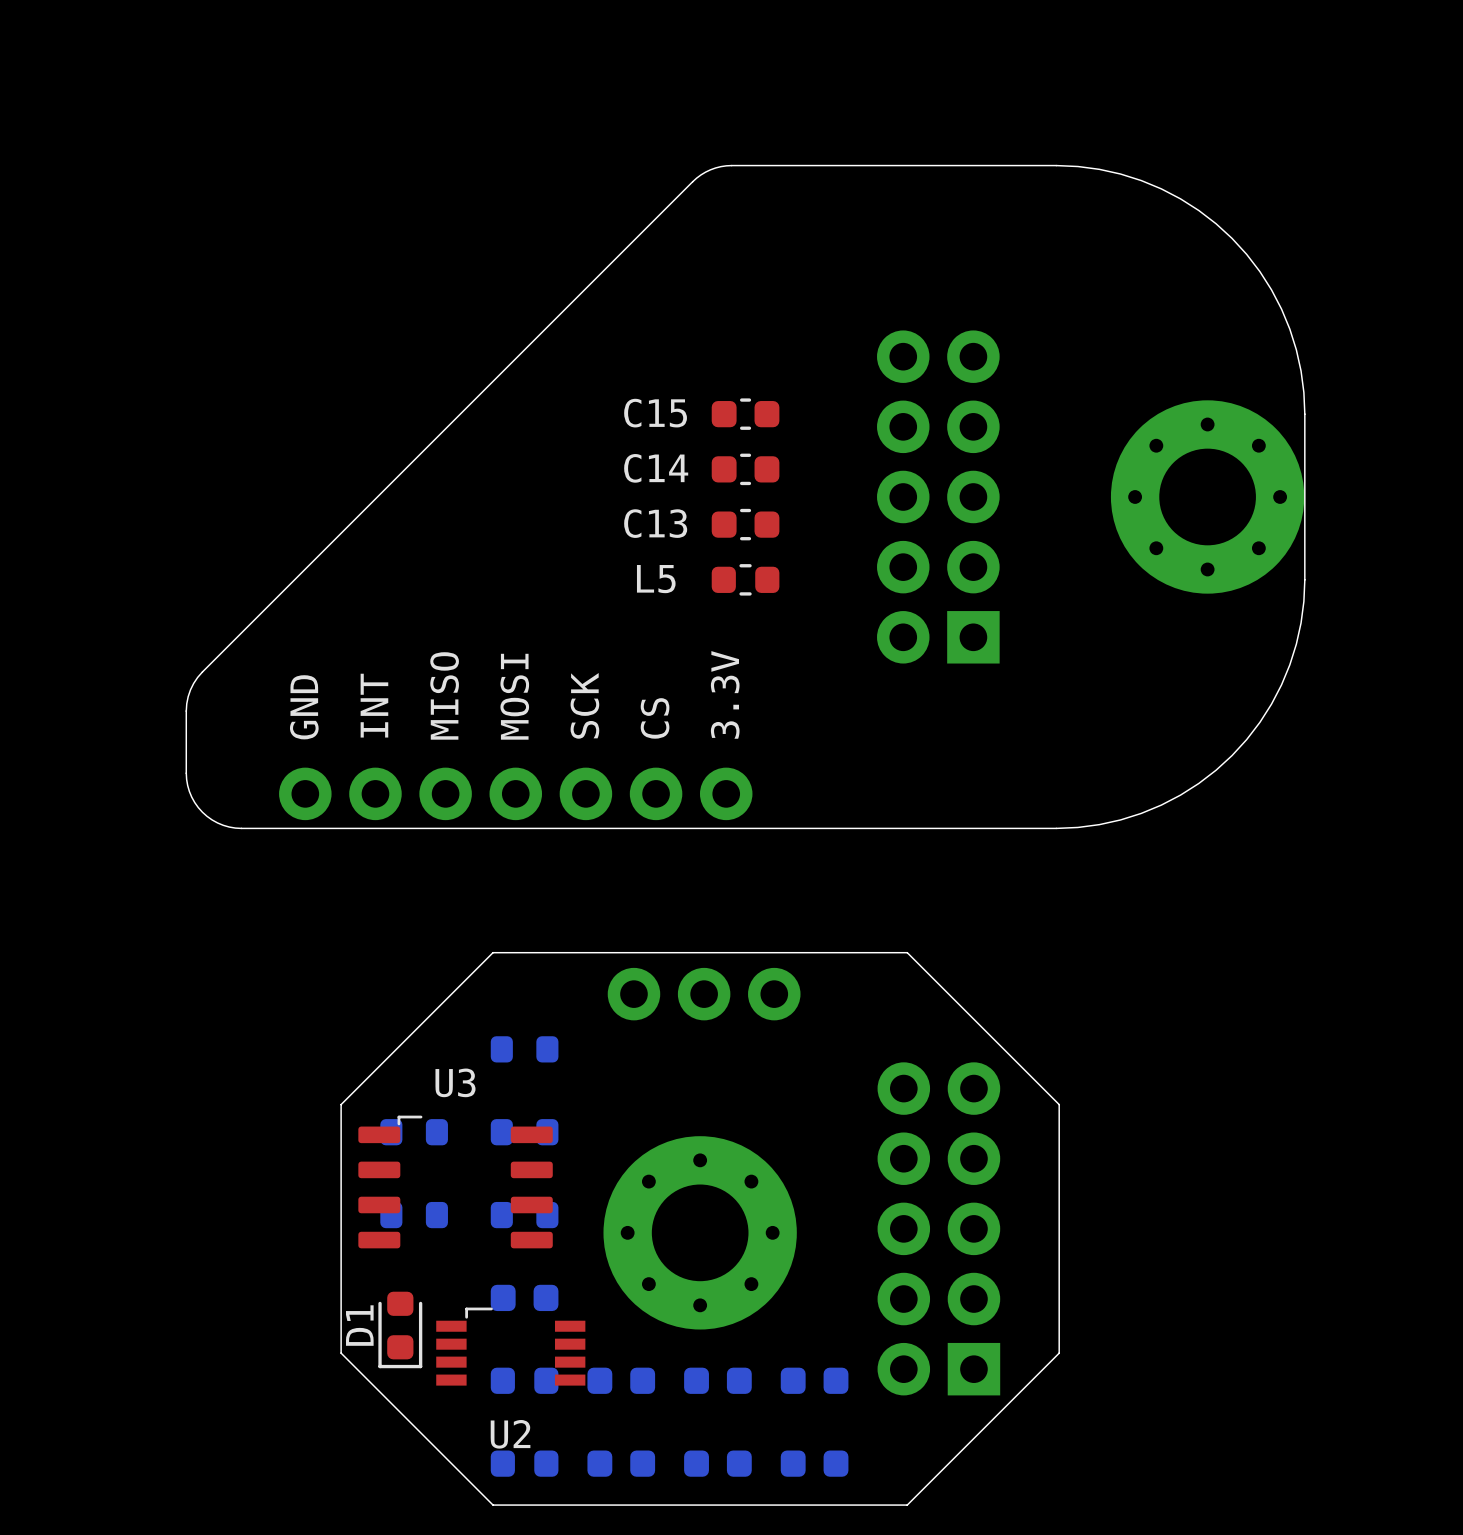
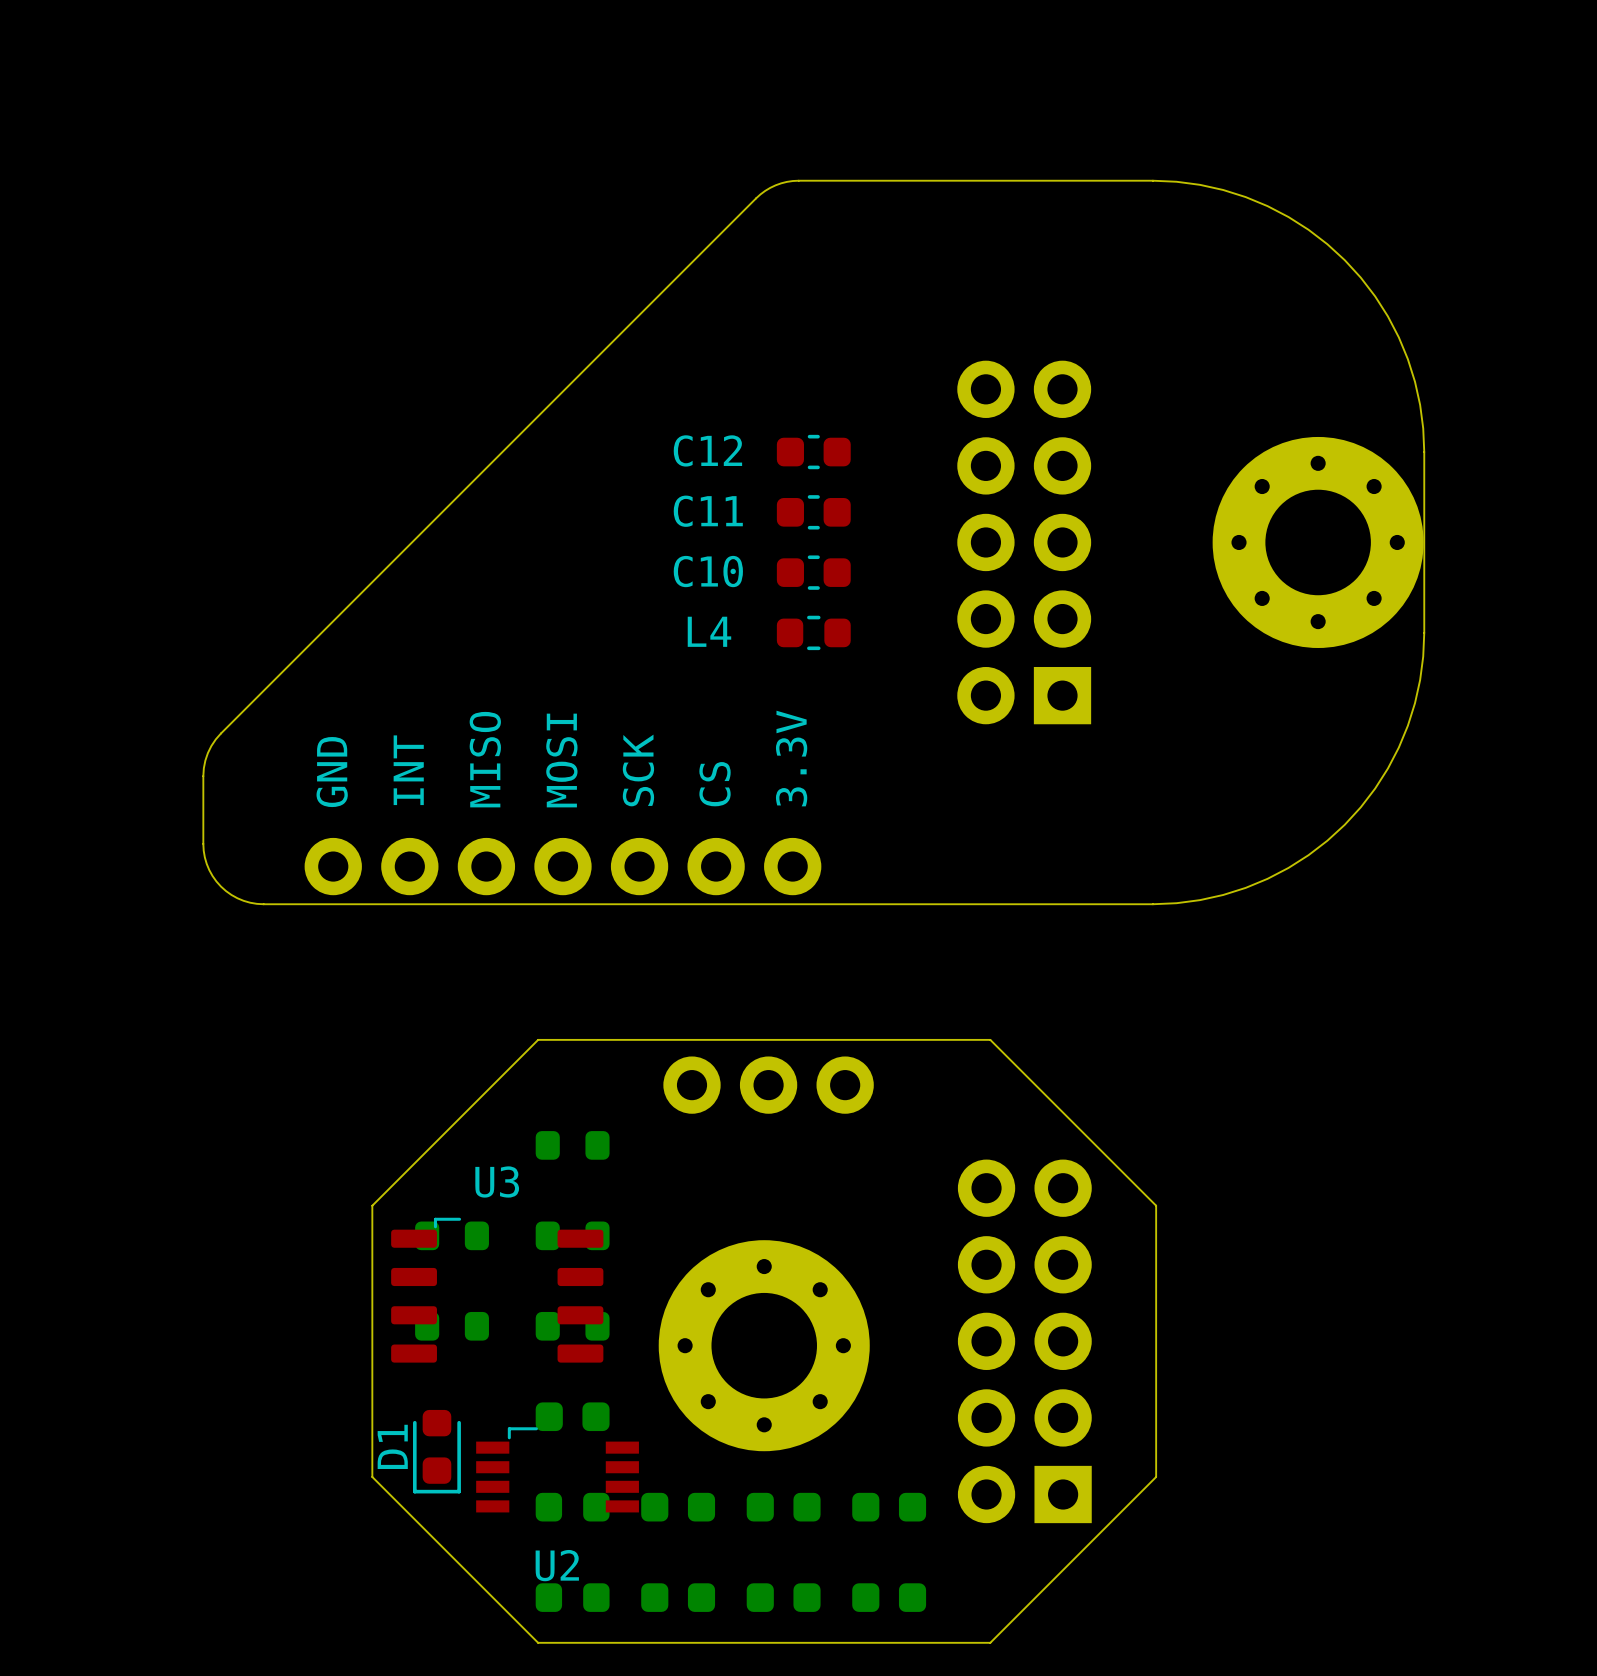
C15 name: C15 (655, 413) -> C12 (707, 450)
C14 name: C14 (656, 468) -> C11 (708, 511)
C13 name: C13 (655, 523) -> C10 (708, 571)
L5 name: L5 (656, 579) -> L4 (709, 631)

